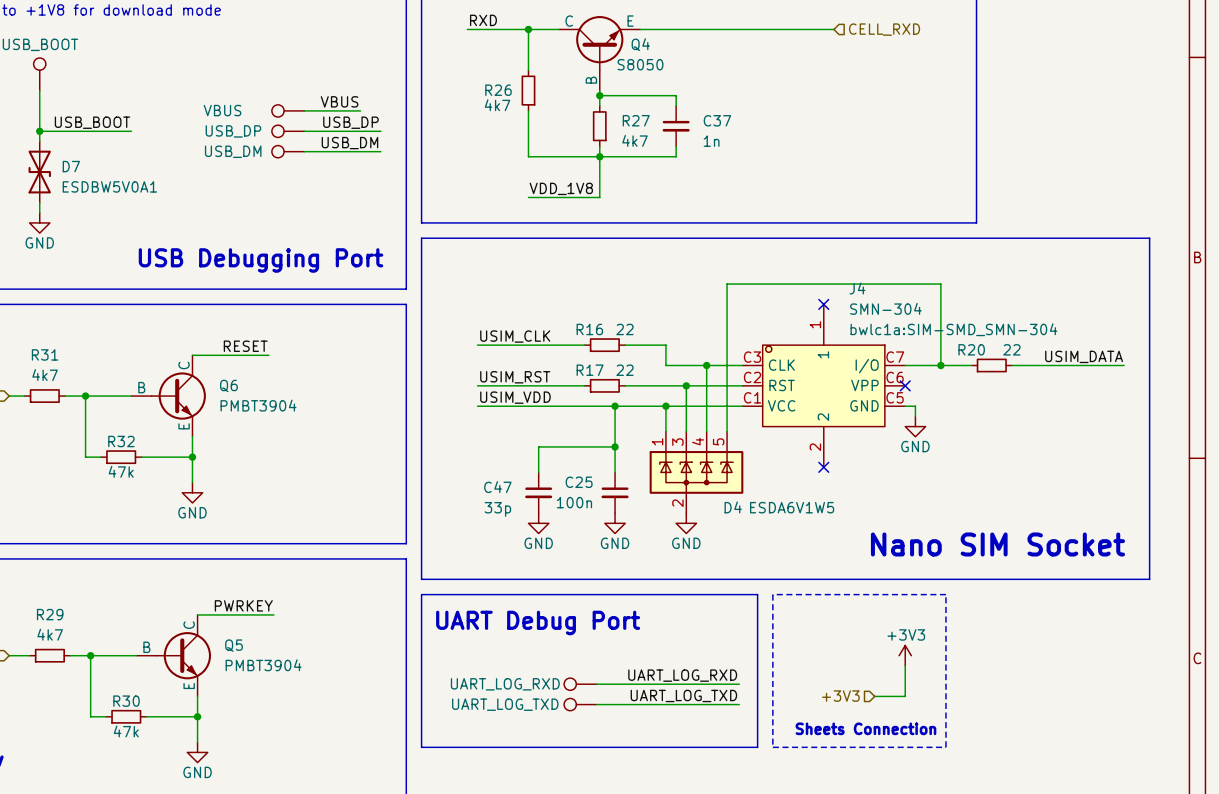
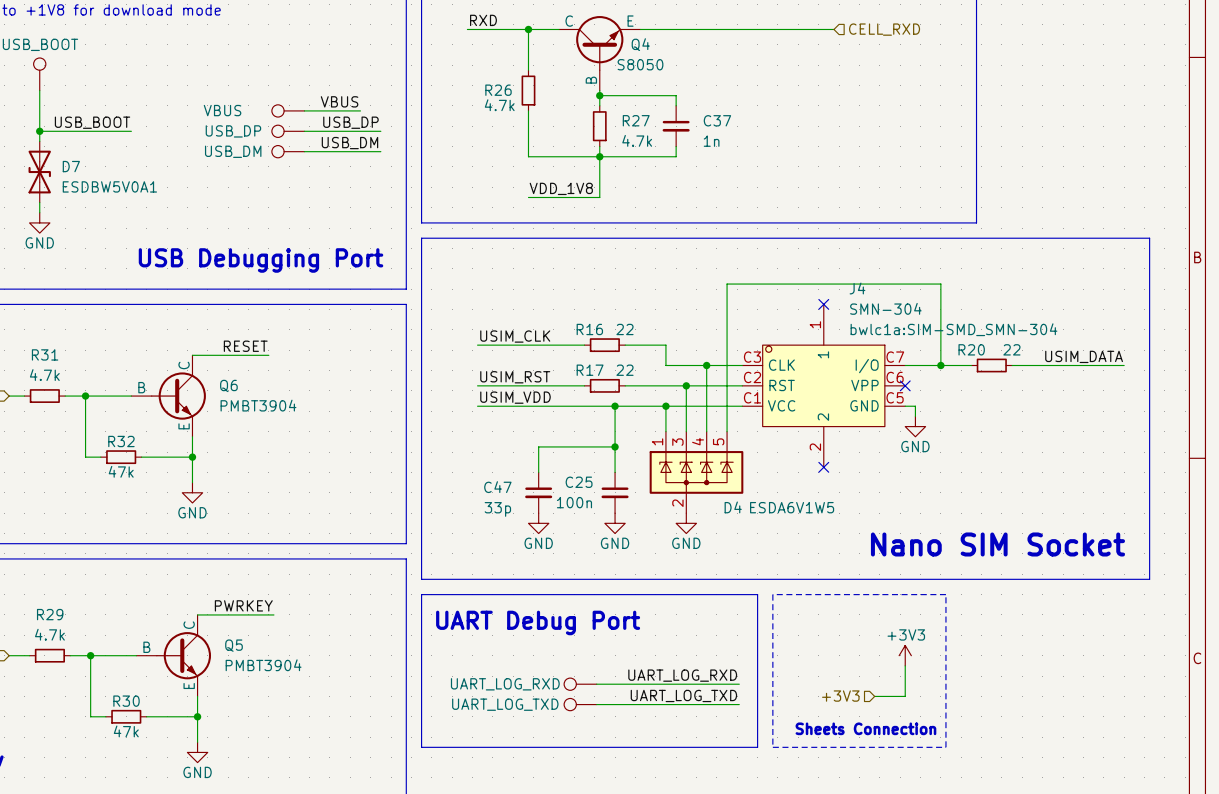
R26 value: 4k7 (497, 105) -> 4.7k (499, 105)
R27 value: 4k7 (634, 140) -> 4.7k (637, 140)
R31 value: 4k7 (45, 375) -> 4.7k (44, 375)
R29 value: 4k7 (50, 634) -> 4.7k (49, 634)

